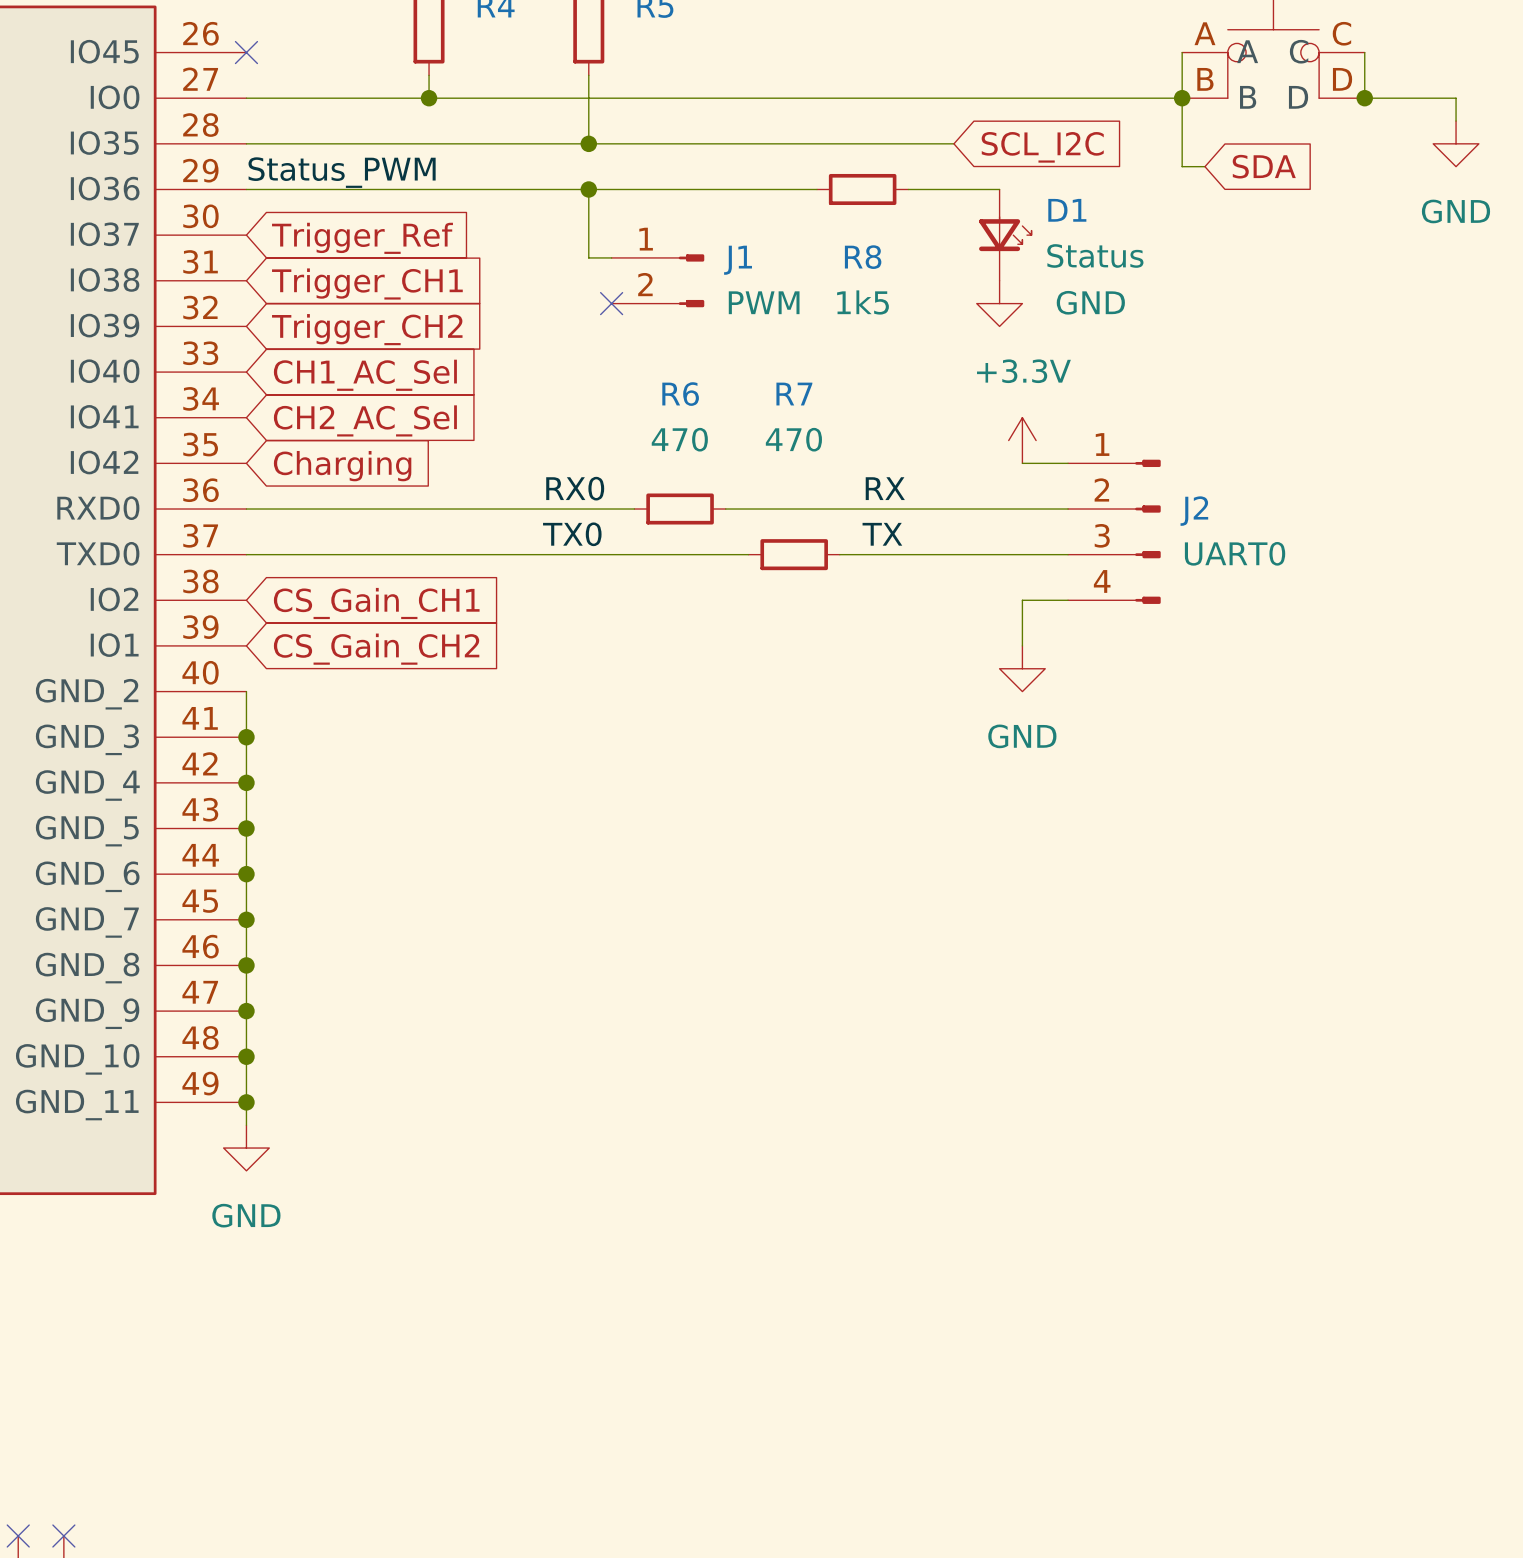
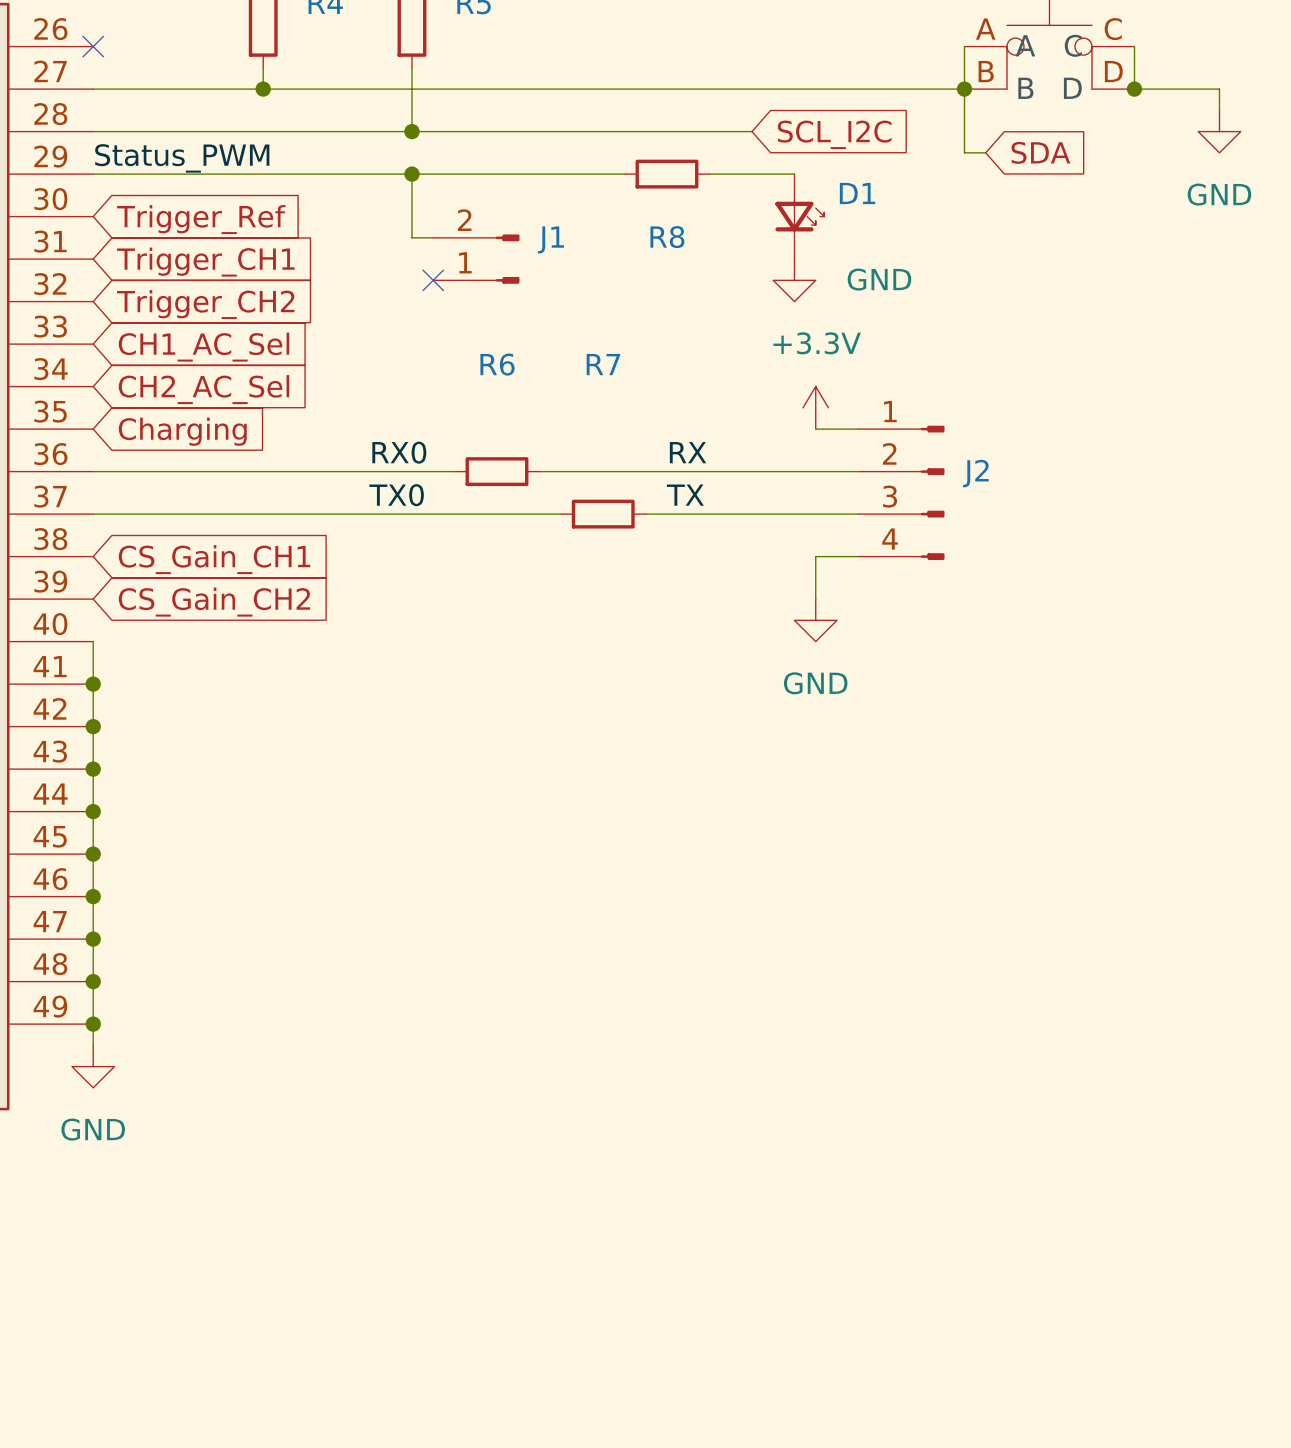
D1 value: Status (1095, 255) -> none
J1 flip: as is (691, 280) -> up-down (507, 259)
J1 value: PWM (764, 302) -> none
R8 value: 1k5 (863, 302) -> none
R6 value: 470 (679, 439) -> none
R7 value: 470 (793, 439) -> none
J2 value: UART0 (1235, 553) -> none

